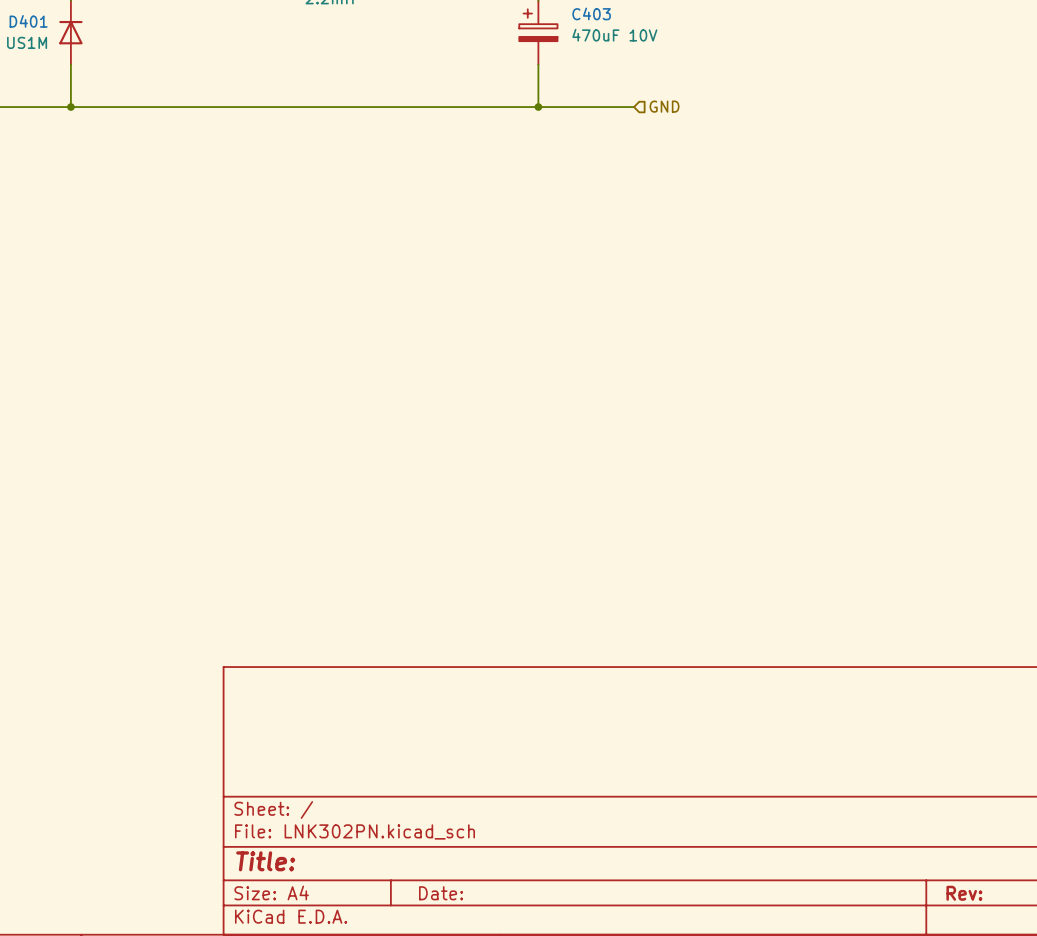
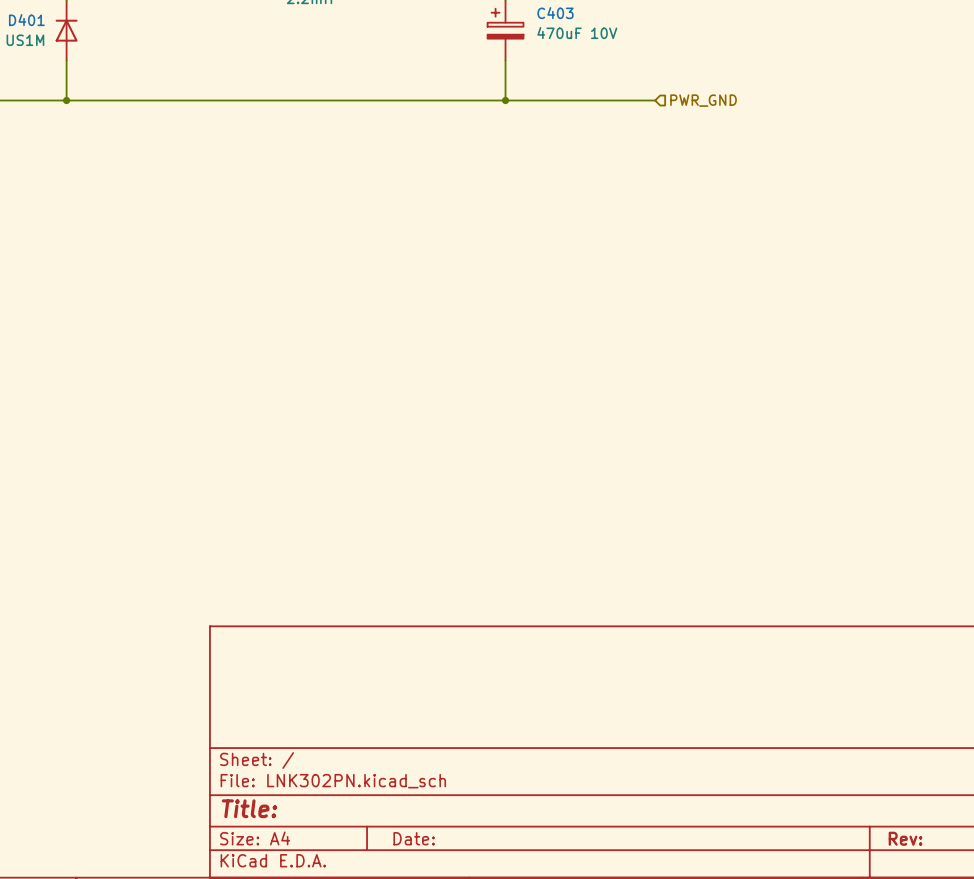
hierarchical label: GND (664, 106) -> none
wire: none -> (595, 100) (655, 100)
hierarchical label: none -> PWR_GND (703, 100)

